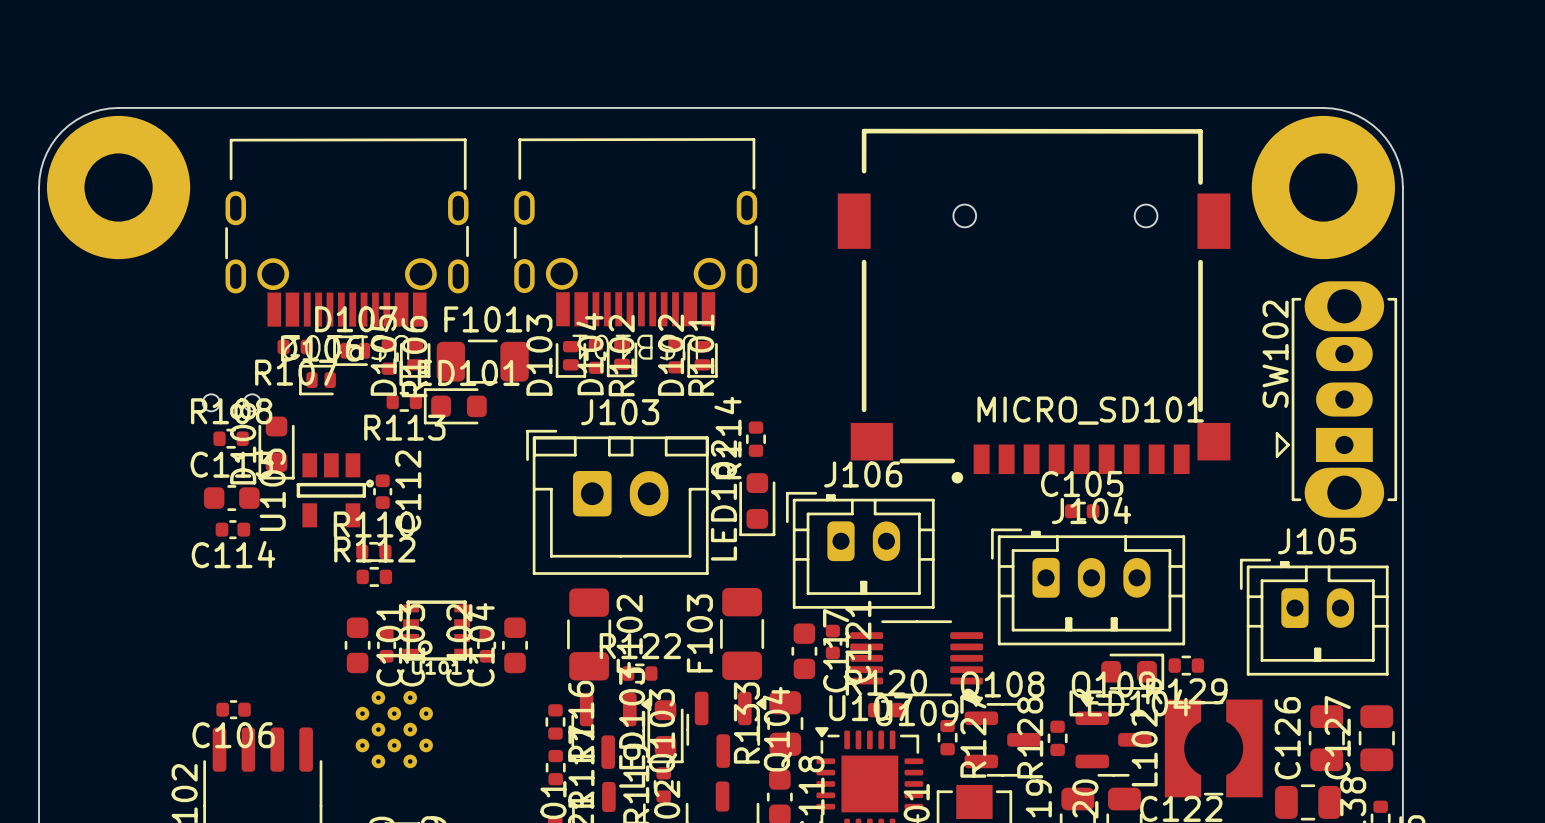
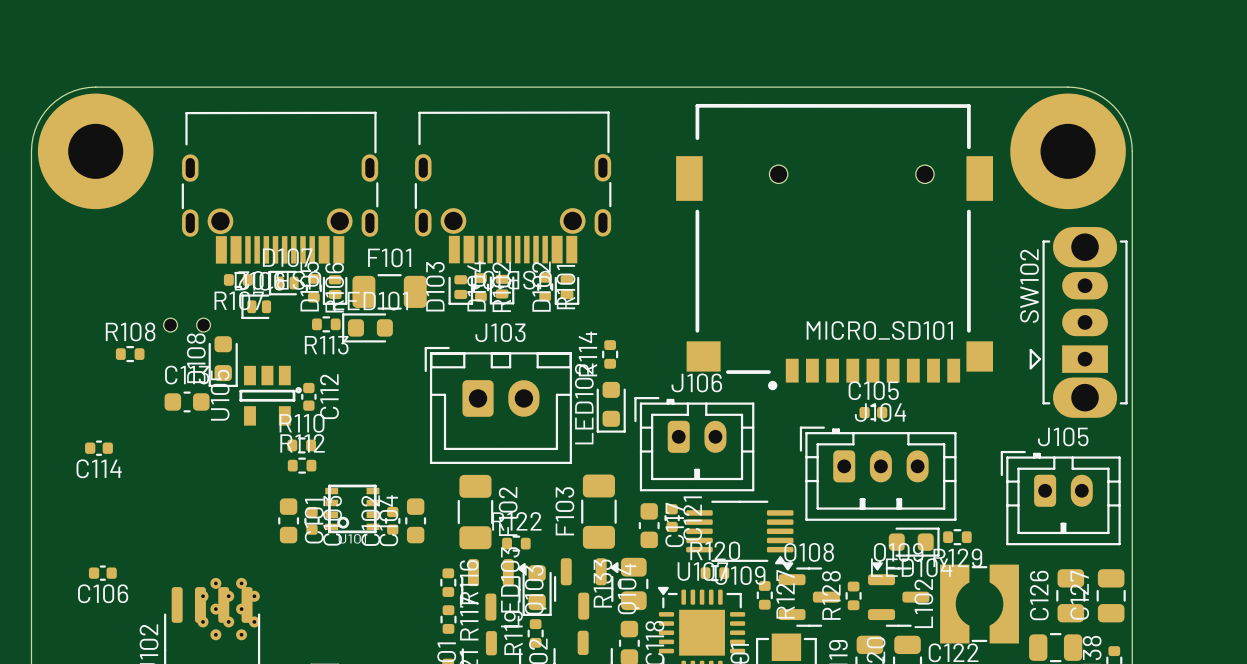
R108 position: (231, 438) -> (130, 354)
C114 position: (232, 529) -> (99, 448)
C106 position: (233, 709) -> (102, 573)
part position: (394, 729) -> (228, 609)

